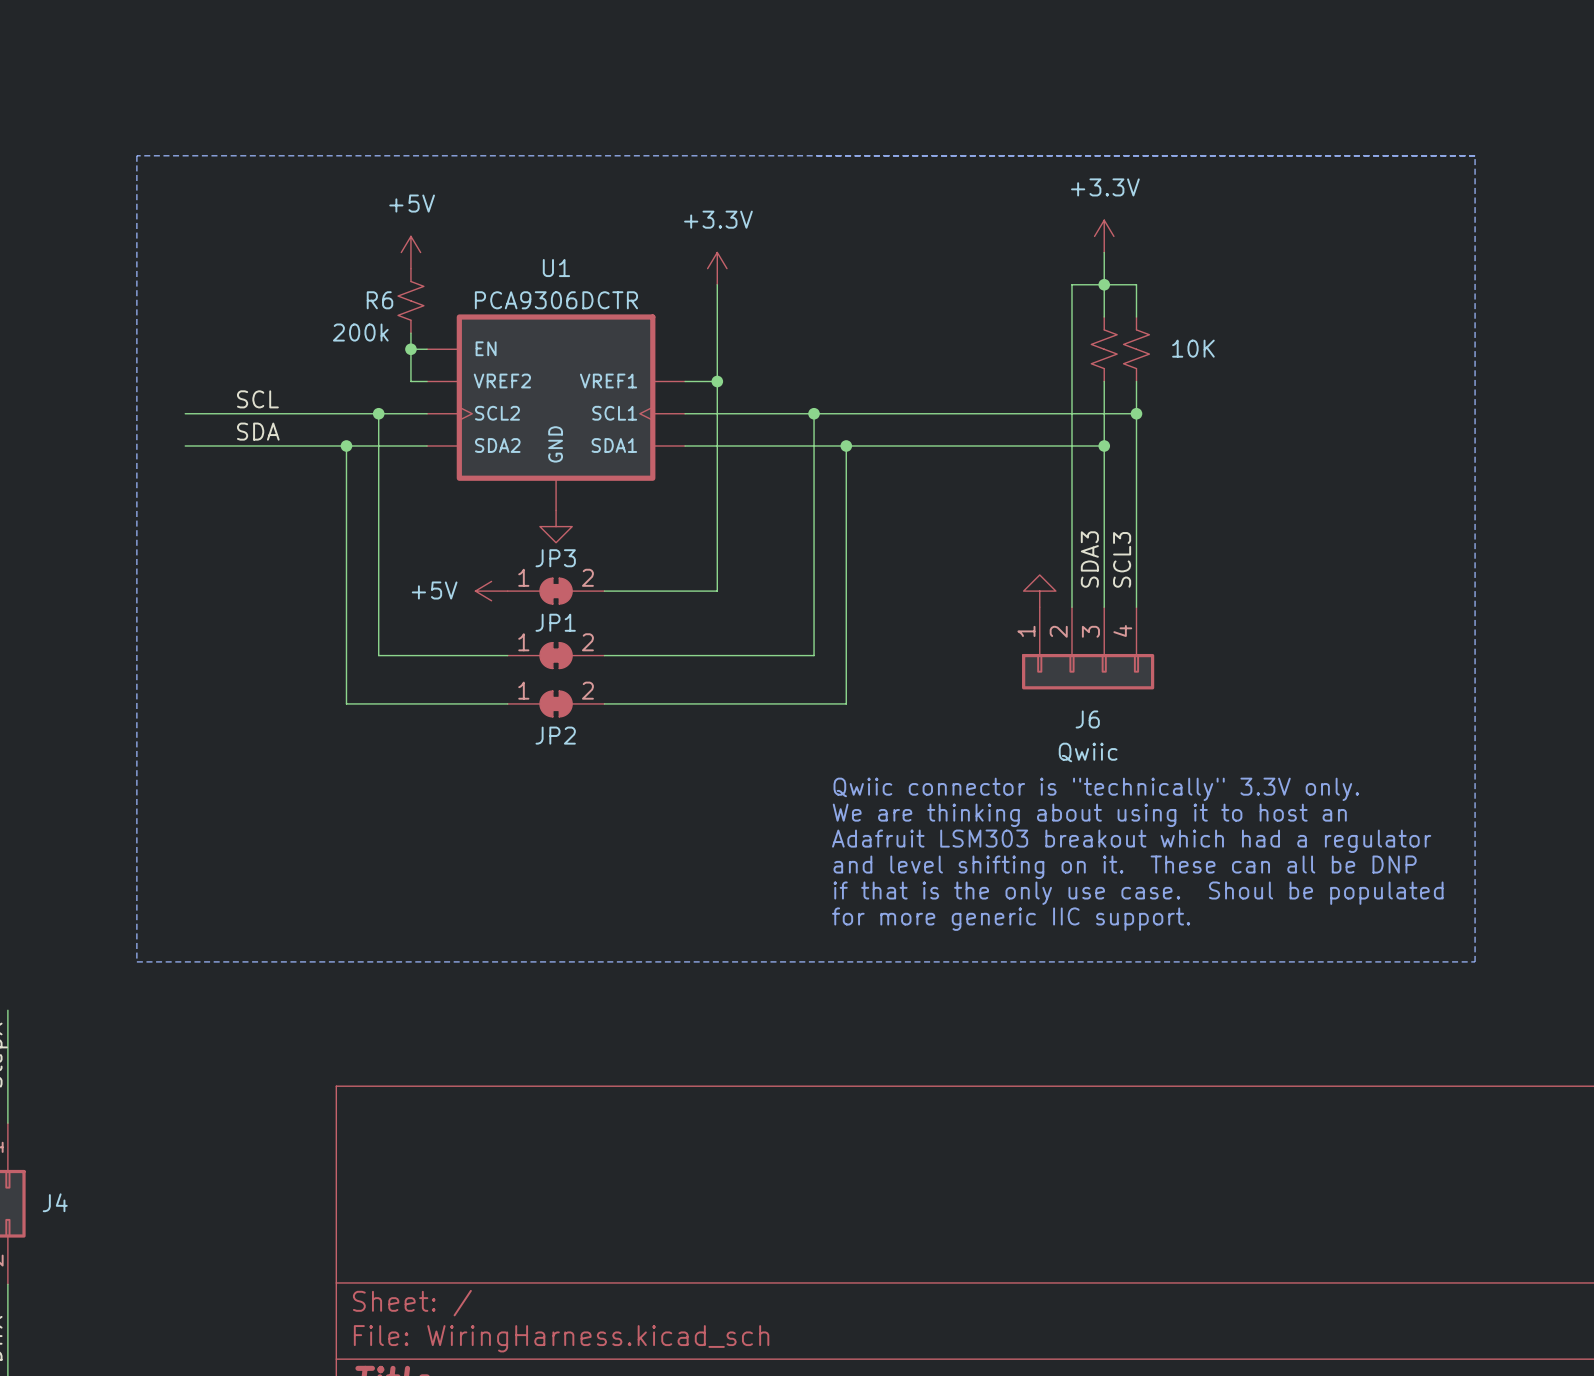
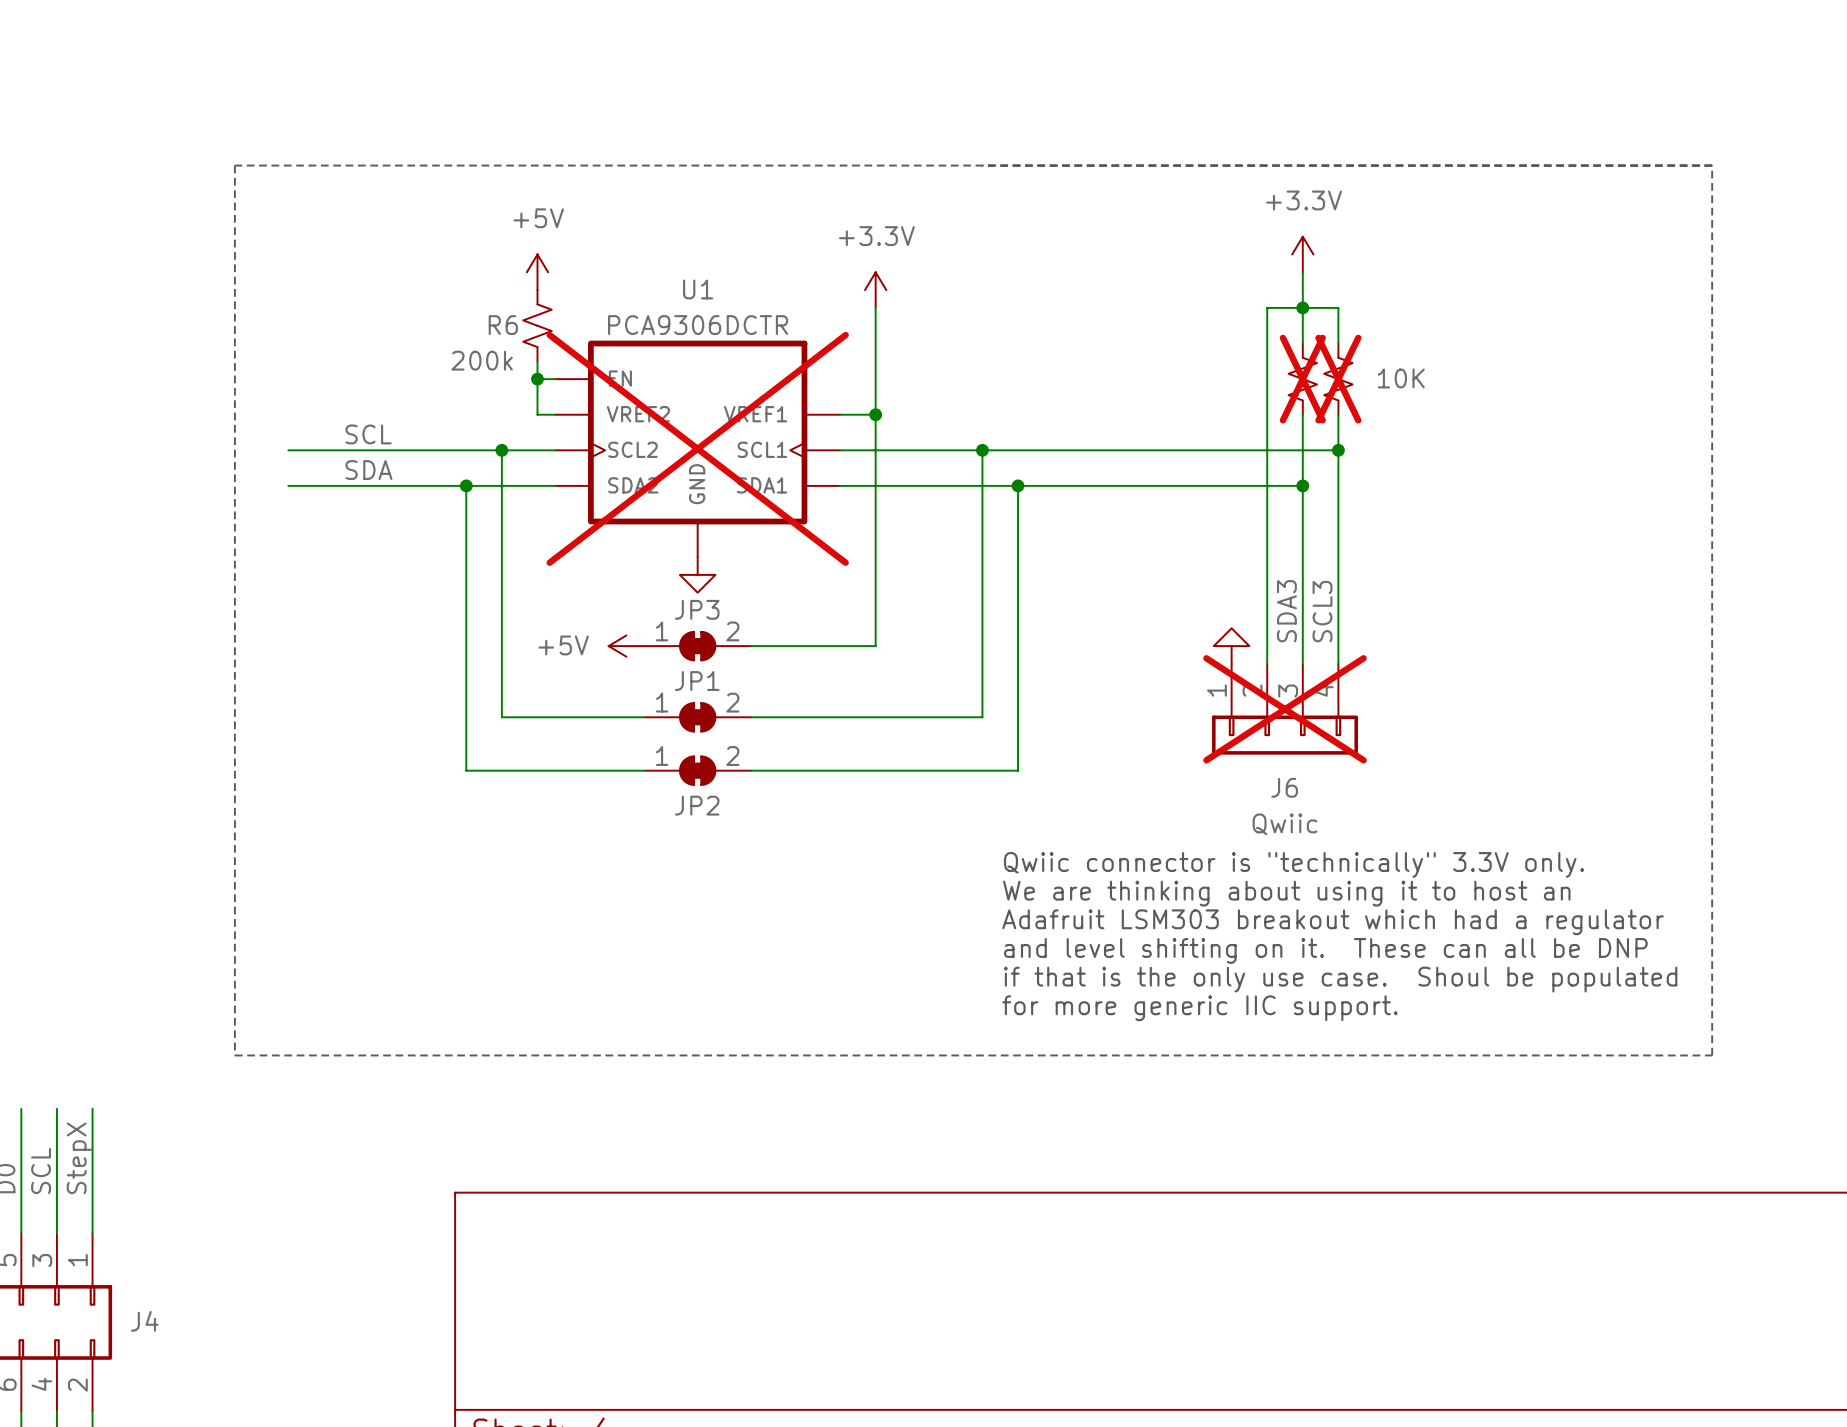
part do-not-place cross: none -> (1302, 379)
part do-not-place cross: none -> (1338, 379)
U1 do-not-place cross: none -> (697, 448)
J6 do-not-place cross: none -> (1285, 709)

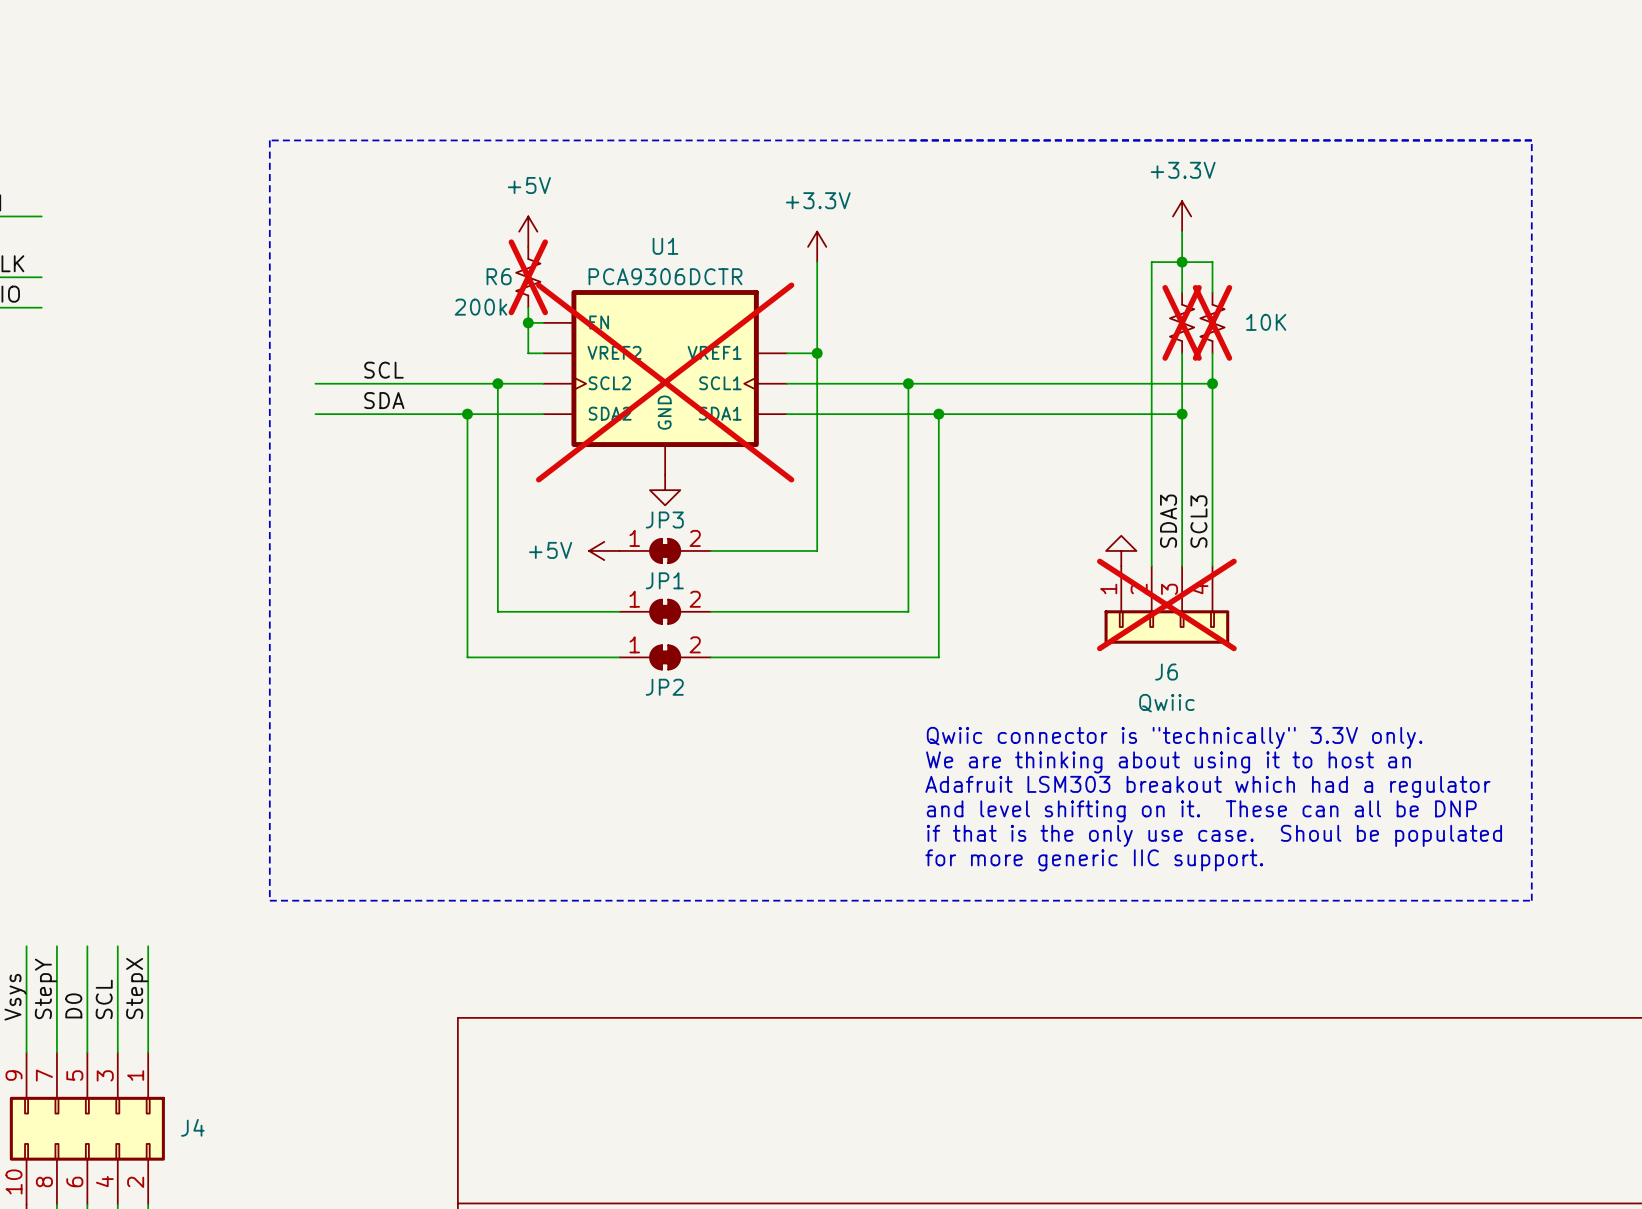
R6 do-not-place cross: none -> (528, 277)

